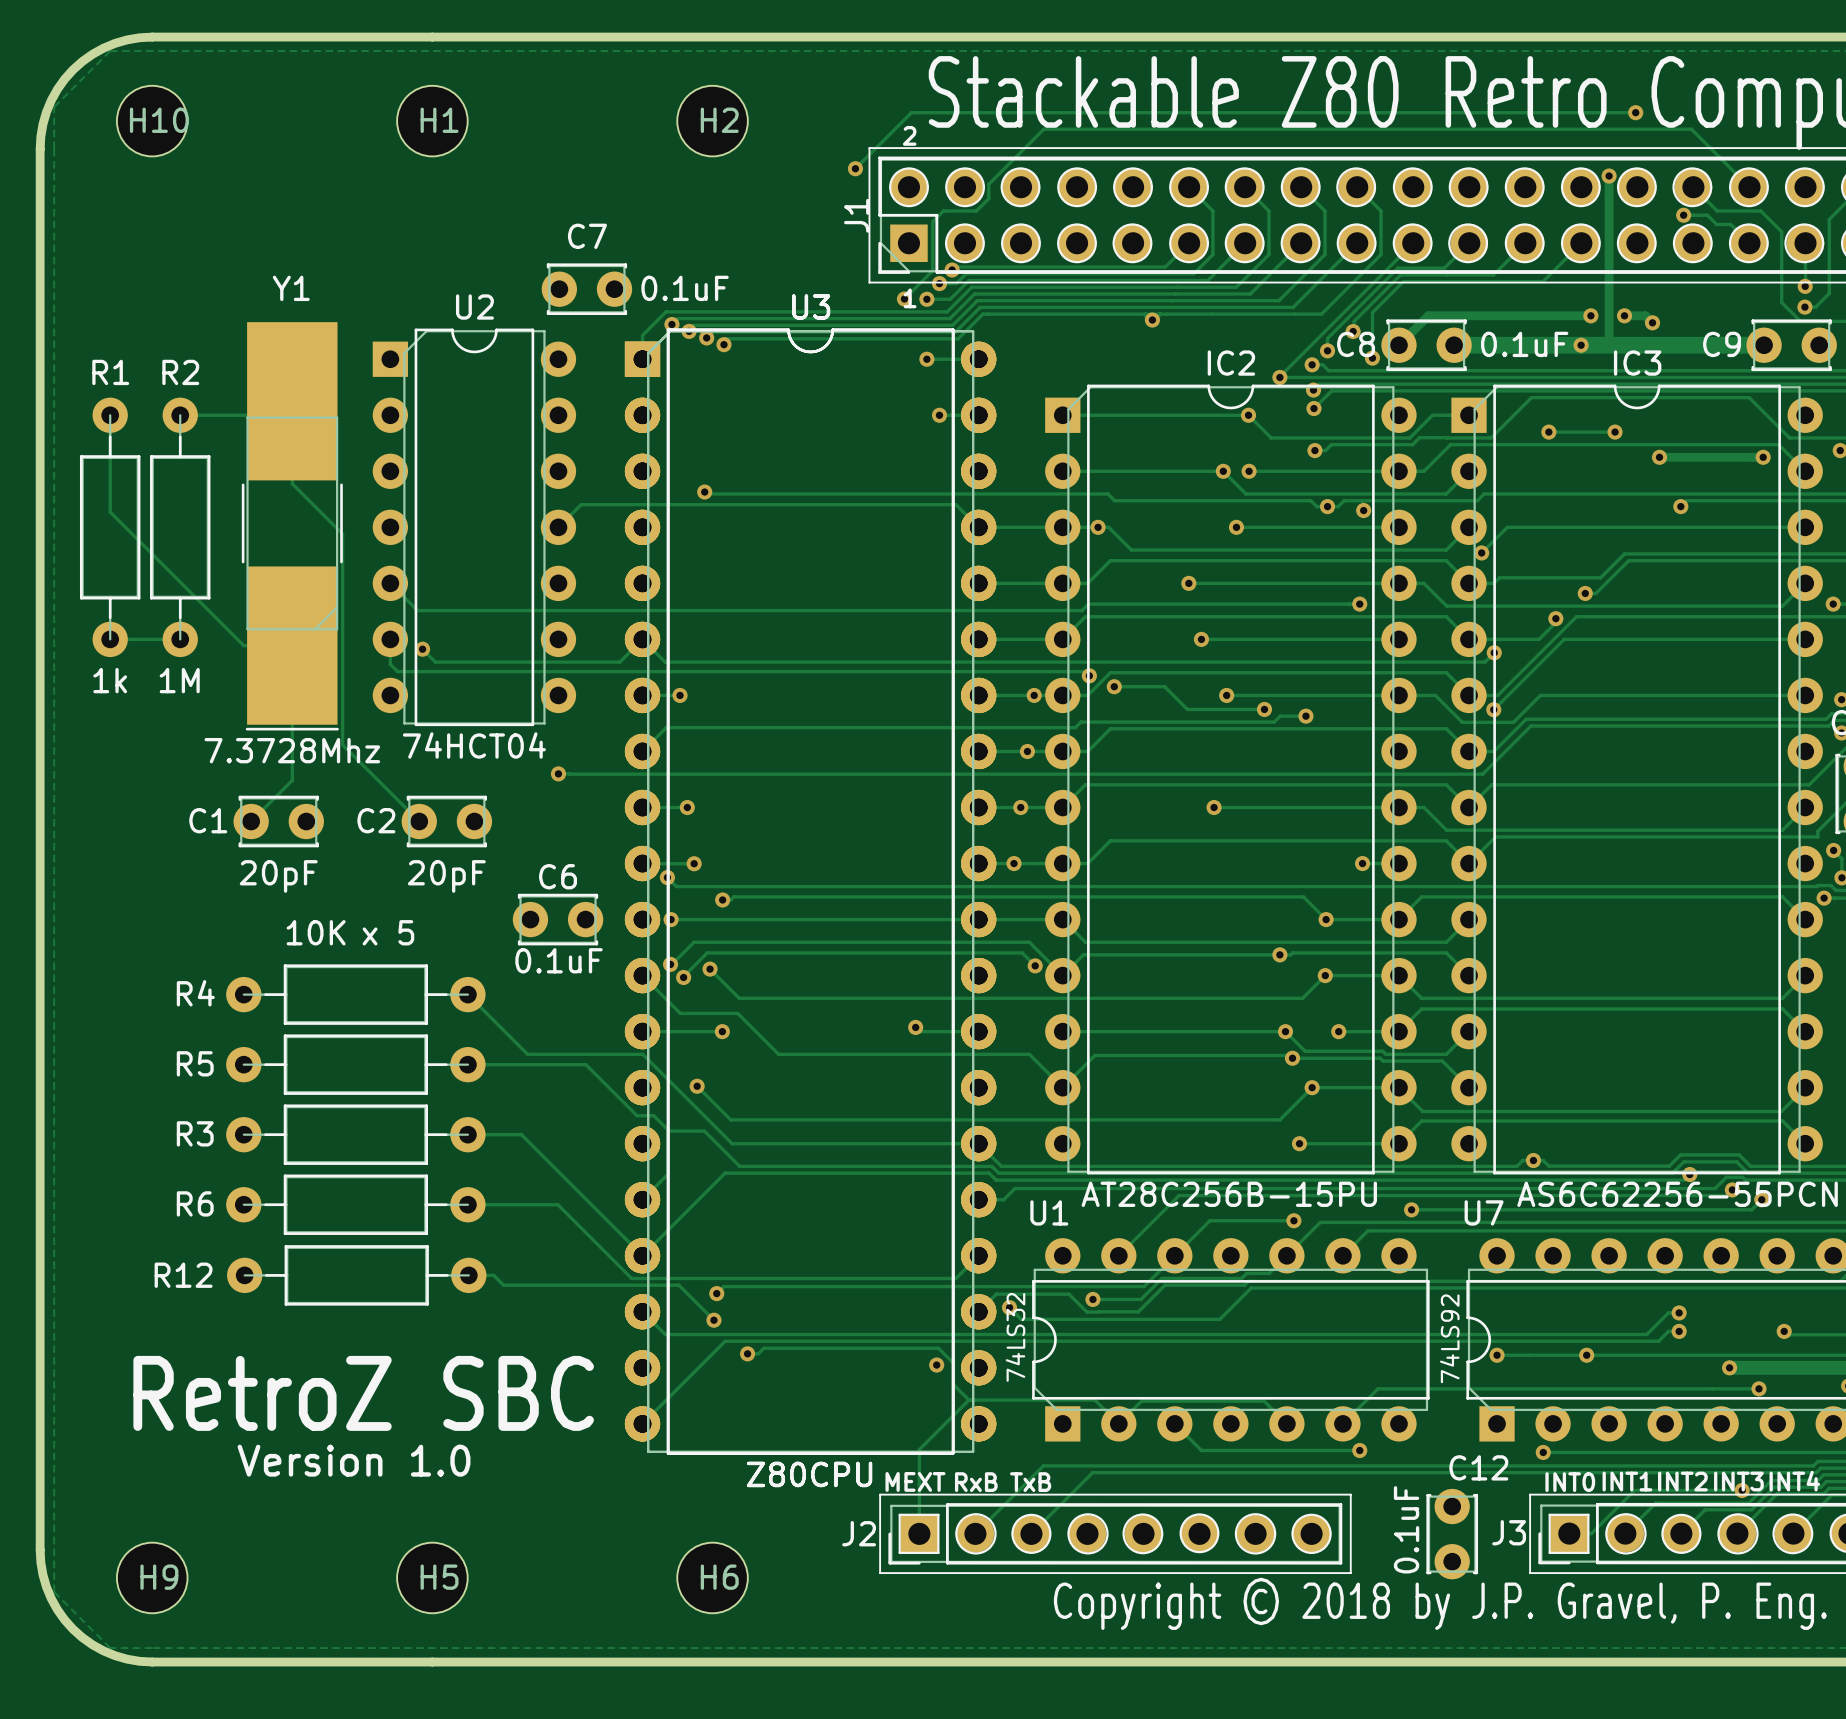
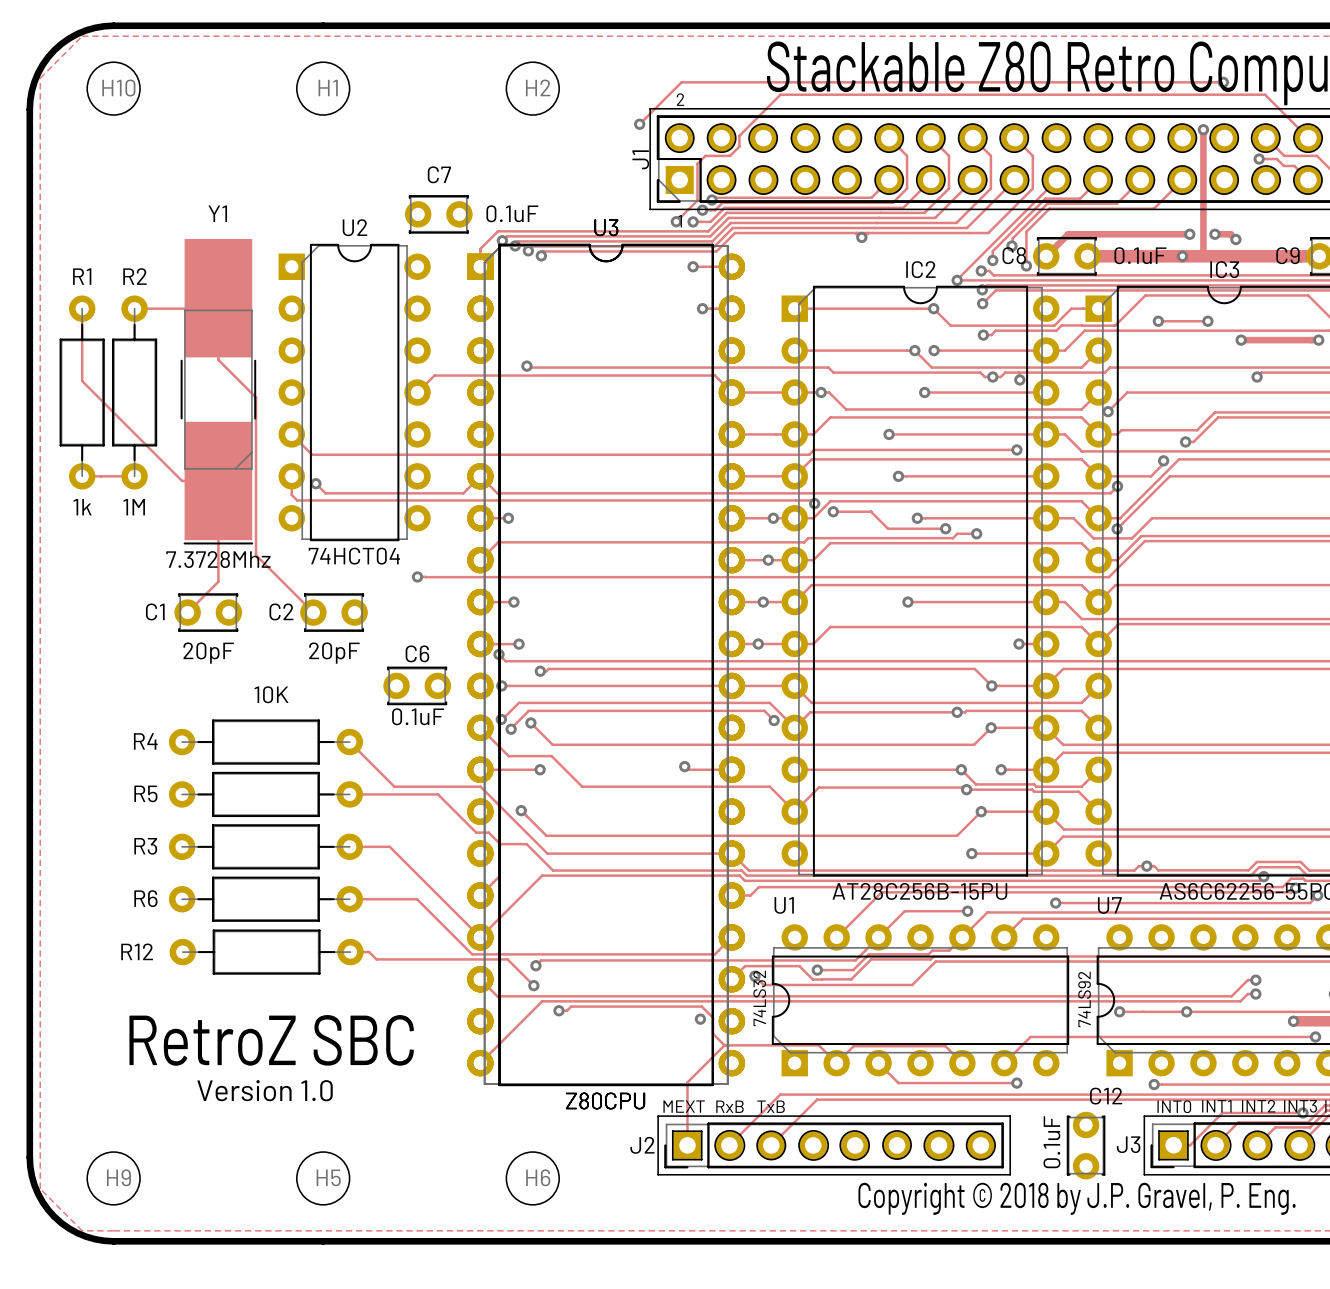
R5 value position: 10K (316, 932) -> 10K (271, 694)
text: x 5 (388, 932) -> none

